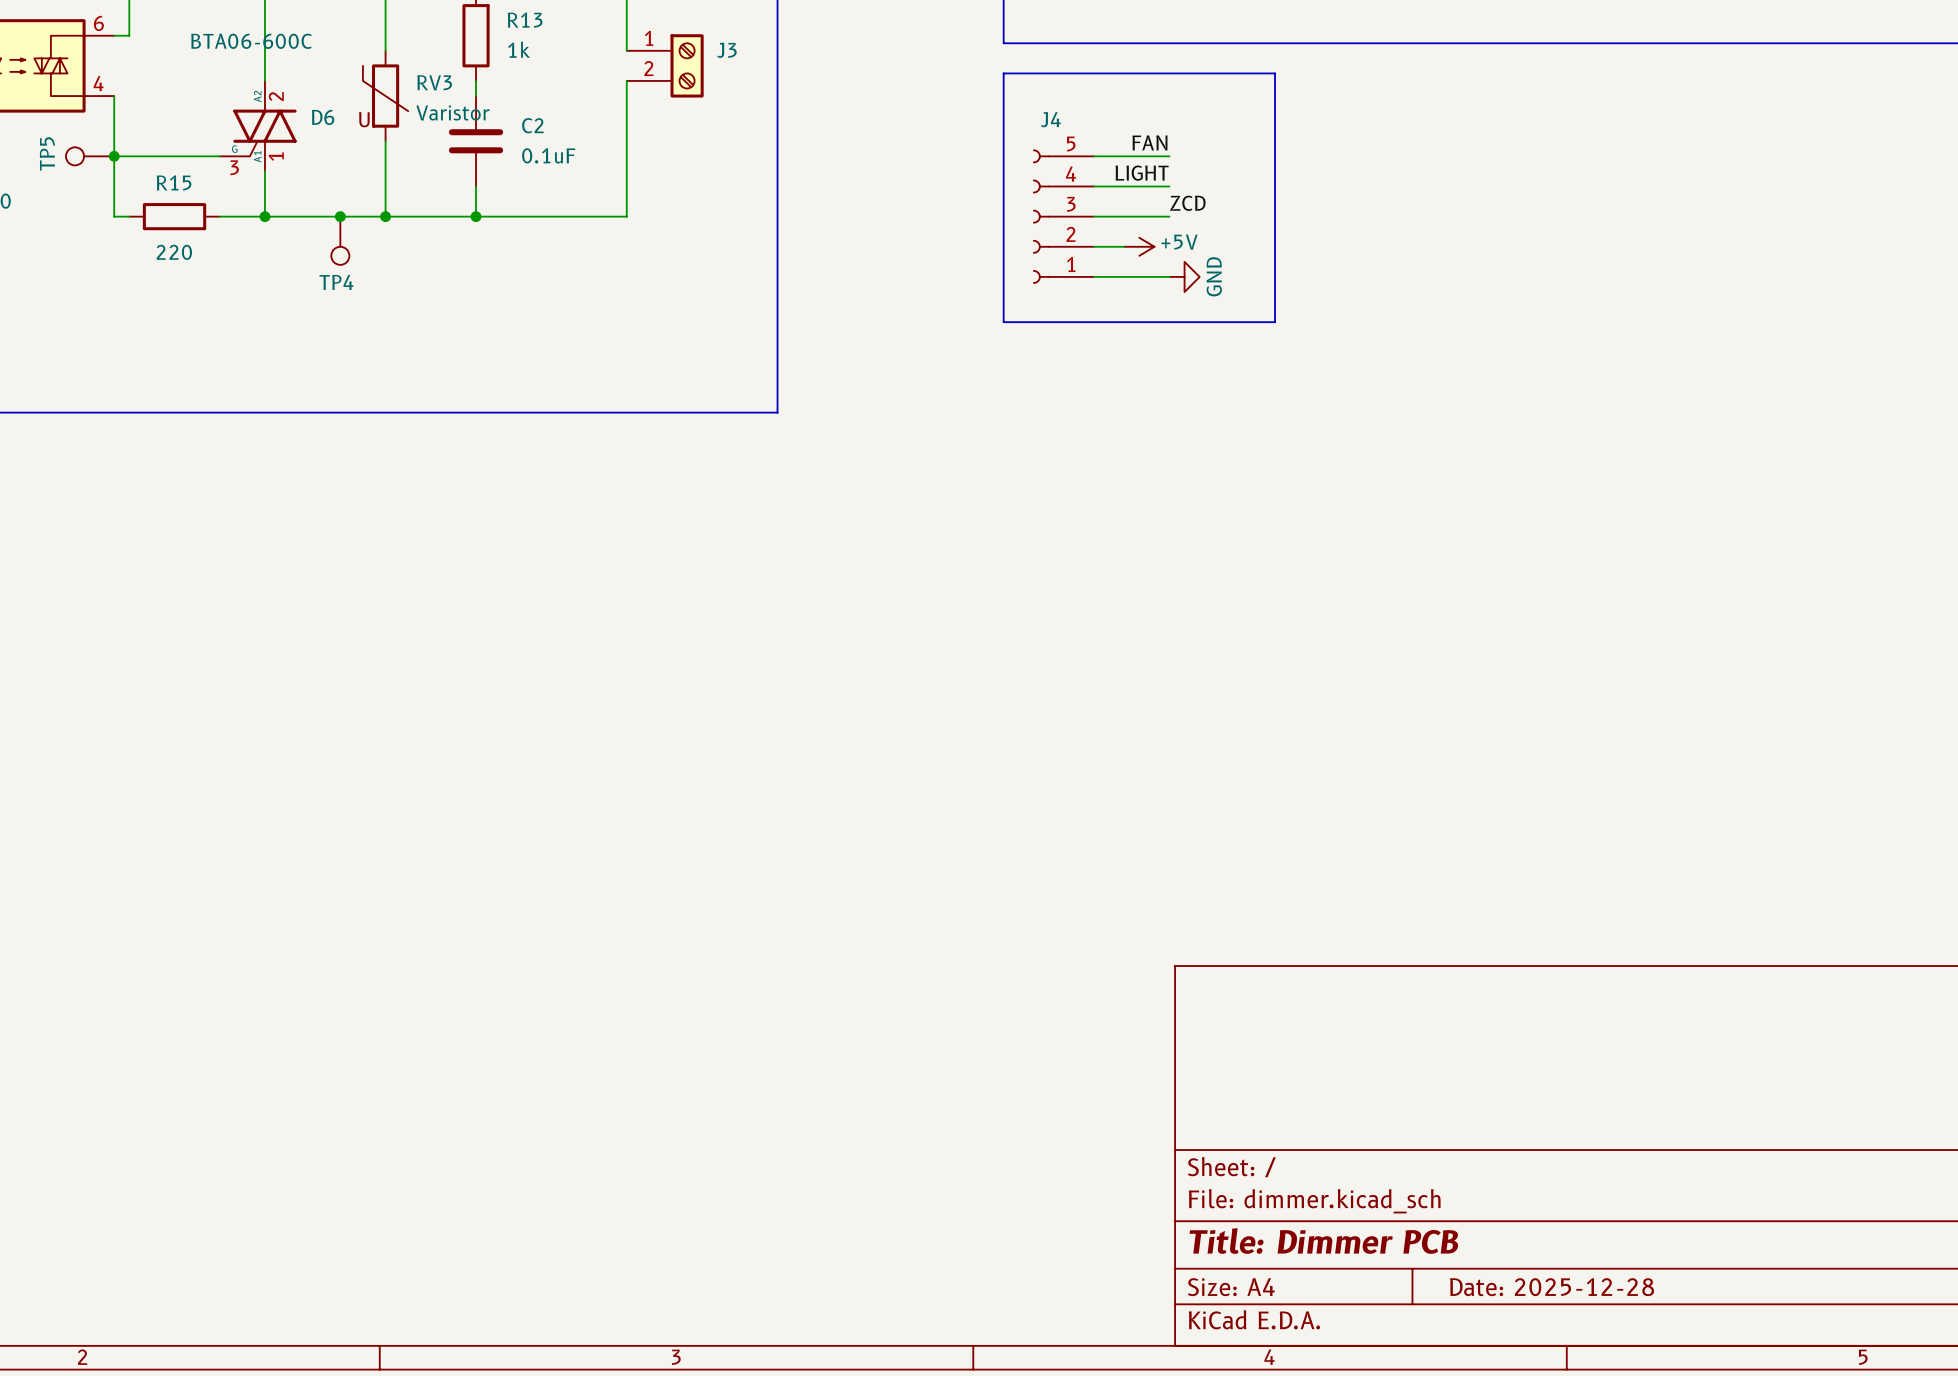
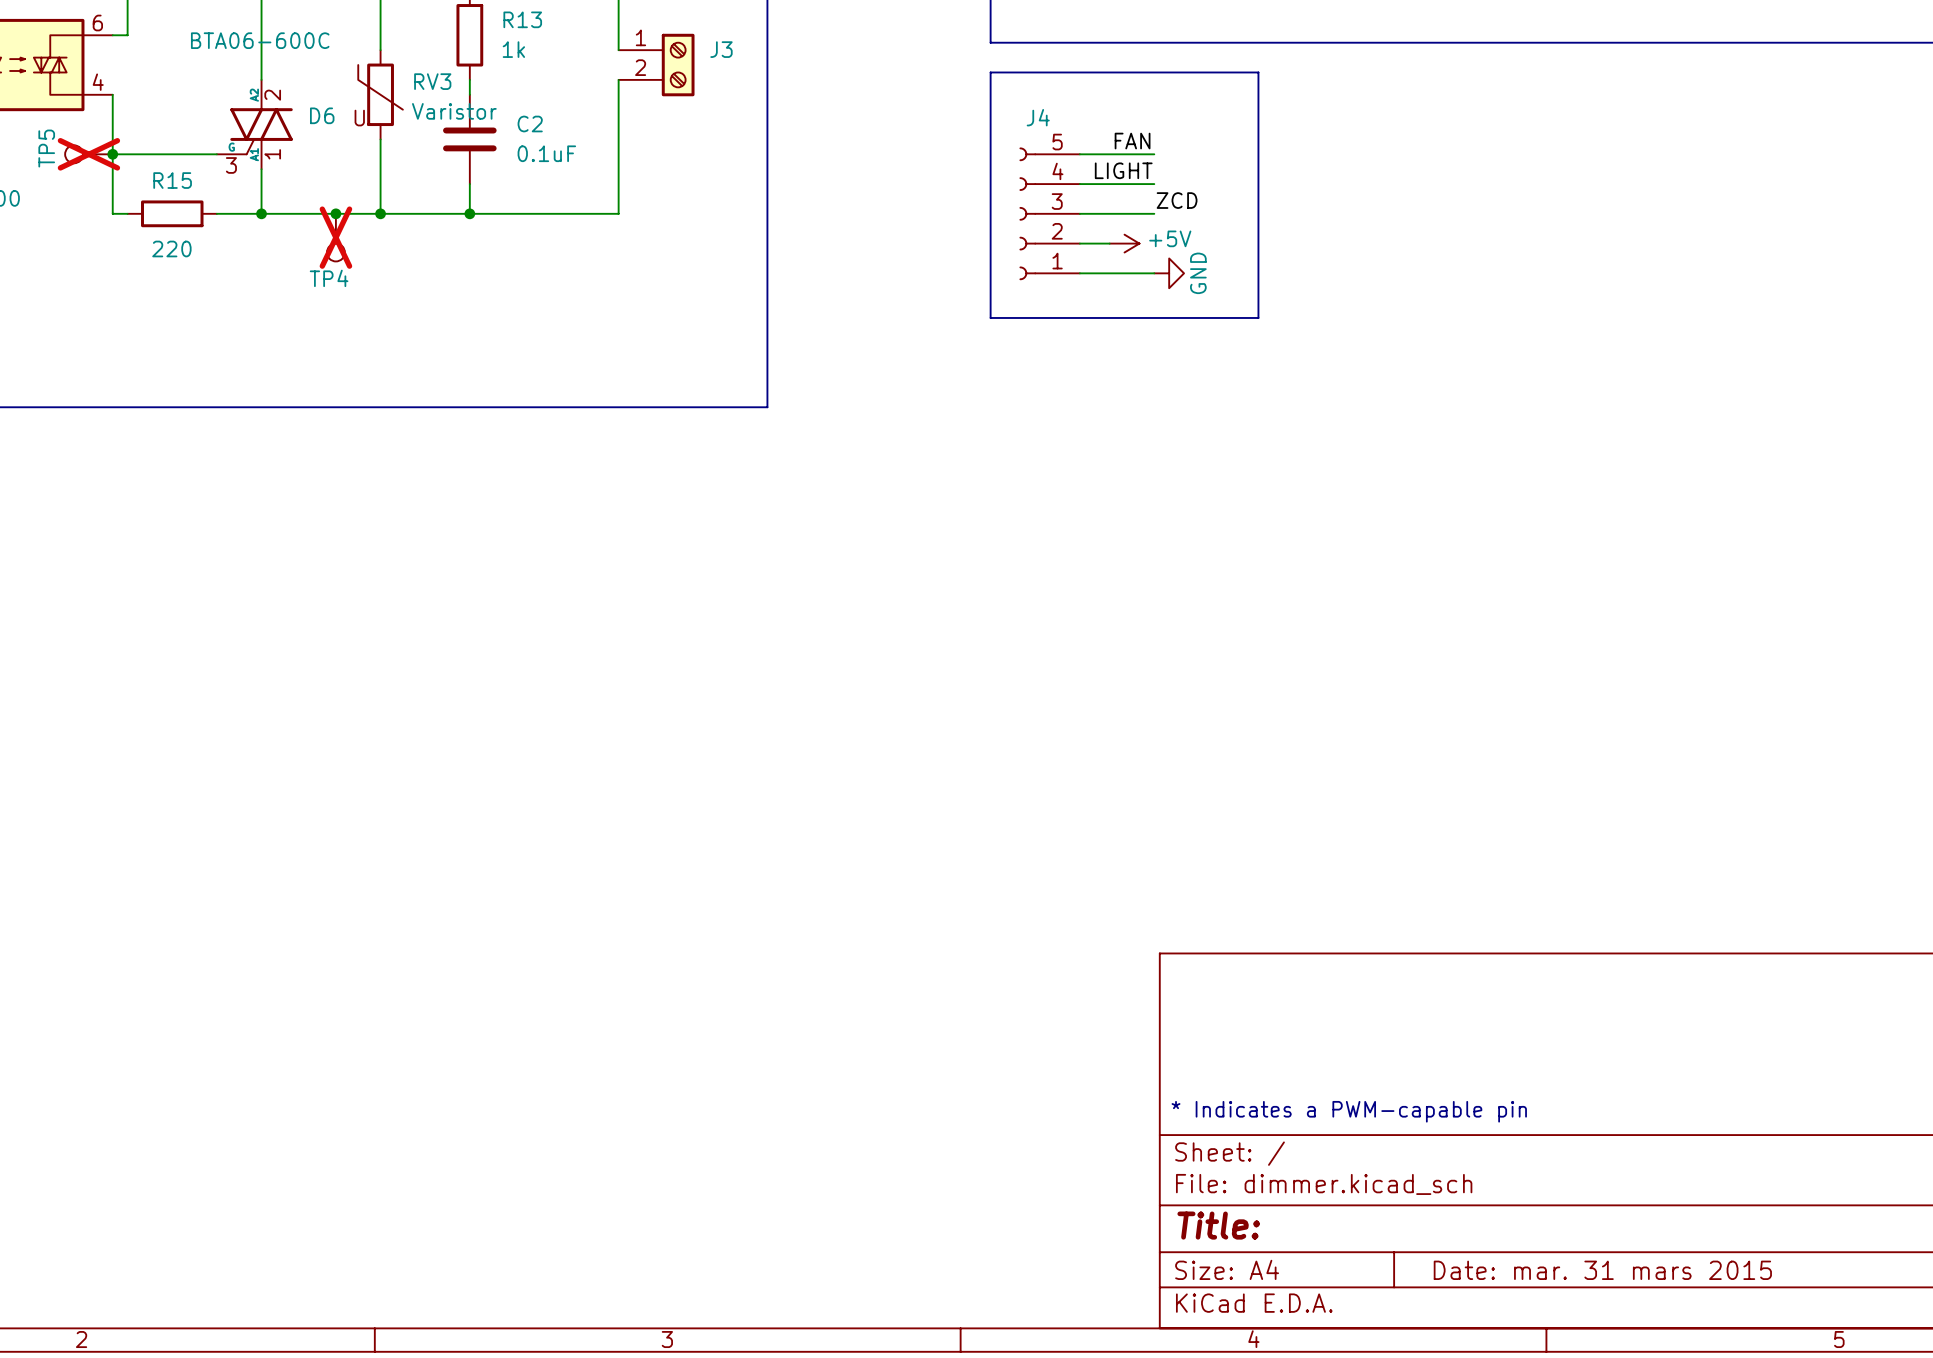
TP5 do-not-place cross: none -> (88, 154)
TP4 do-not-place cross: none -> (335, 237)
text: none -> * Indicates a PWM-capable pin (1349, 1111)
title block: Title: Dimmer PCB (1323, 1241) -> Title: (1218, 1225)
title block: Date: 2025-12-28 (1552, 1287) -> Date: mar. 31 mars 2015 (1602, 1270)

